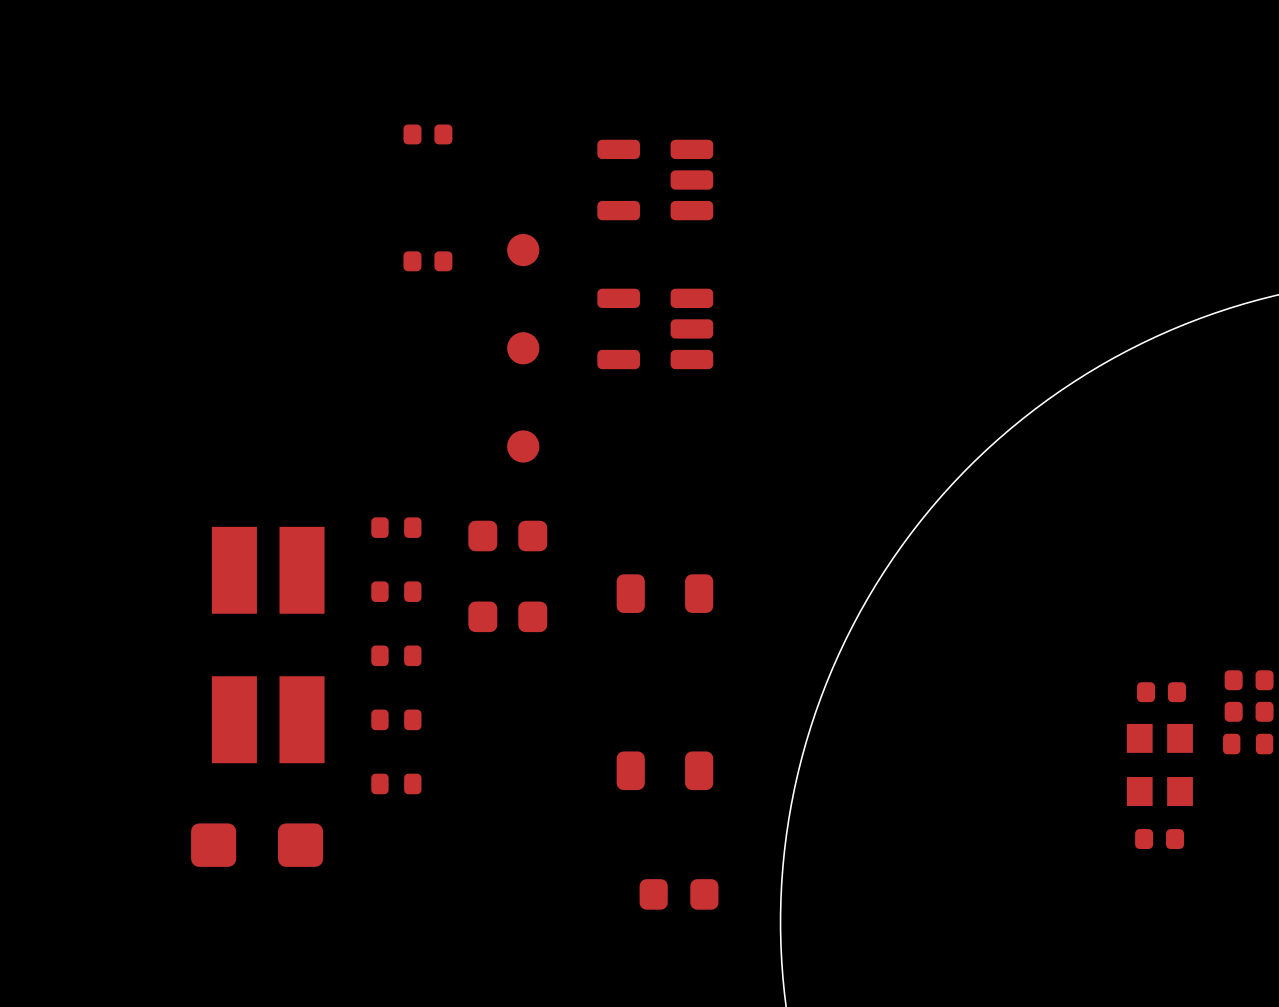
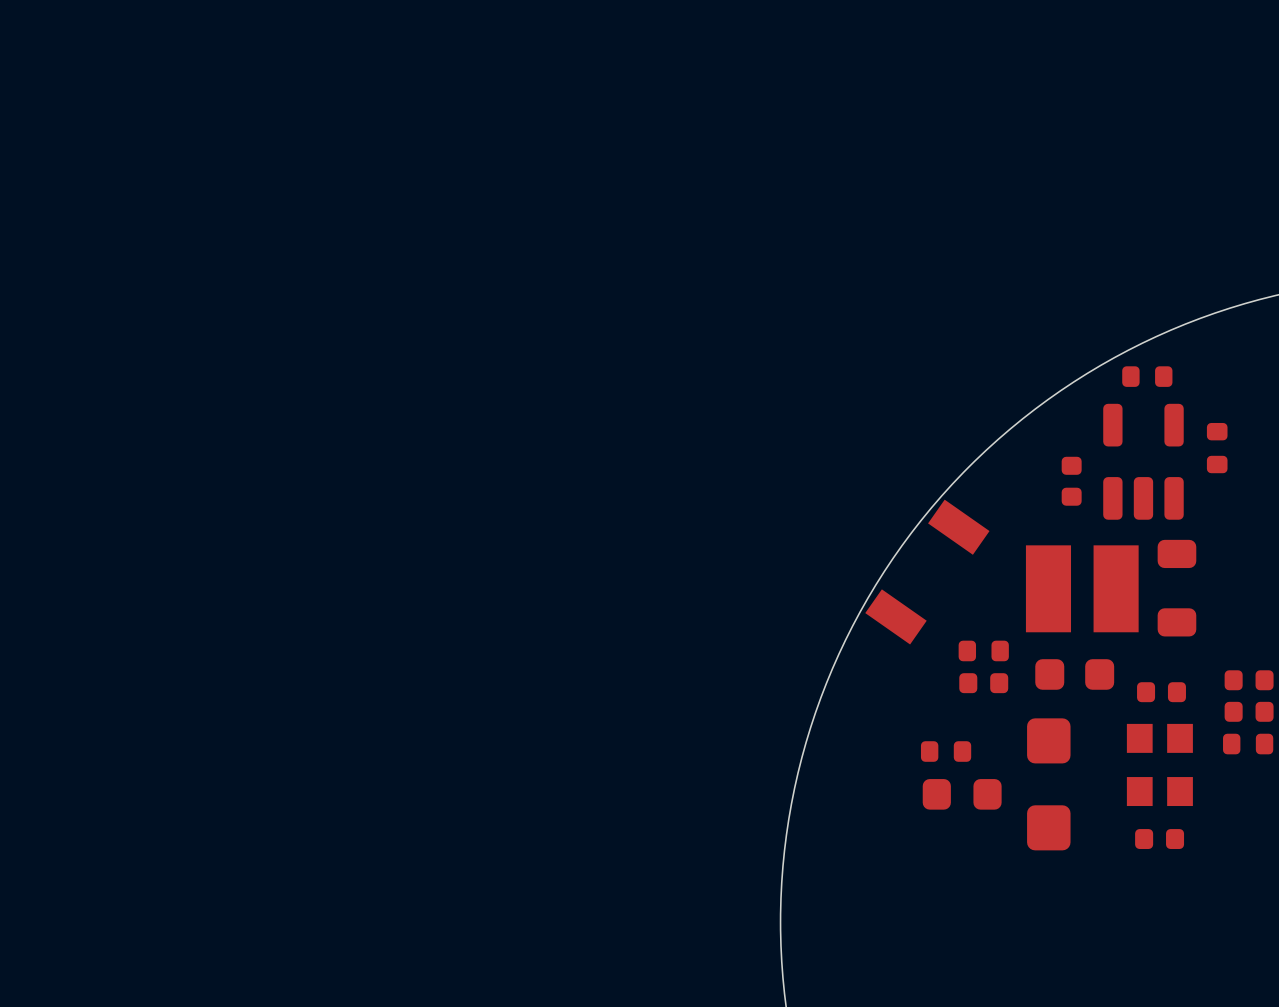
part: (427, 134) -> none
part: (655, 180) -> none
part: (523, 250) -> none
part: (427, 261) -> none
part: (655, 328) -> none
part: (523, 348) -> none
part: none -> (1147, 376)
part: (523, 446) -> none
part: none -> (1217, 448)
part: none -> (1143, 461)
part: none -> (1071, 481)
part: (396, 527) -> none
part: (507, 536) -> none
part: (268, 570) -> none
part: none -> (927, 572)
part: none -> (1082, 588)
part: none -> (1176, 588)
part: (396, 591) -> none
part: (664, 593) -> none
part: (507, 616) -> none
part: none -> (983, 650)
part: (396, 655) -> none
part: none -> (1074, 674)
part: none -> (983, 683)
part: (268, 719) -> none
part: (396, 719) -> none
part: none -> (946, 751)
part: (664, 770) -> none
part: (396, 783) -> none
part rotation: 0° (257, 845) -> 90° clockwise (1048, 784)
part position: (257, 845) -> (1048, 784)
part position: (679, 894) -> (962, 794)

